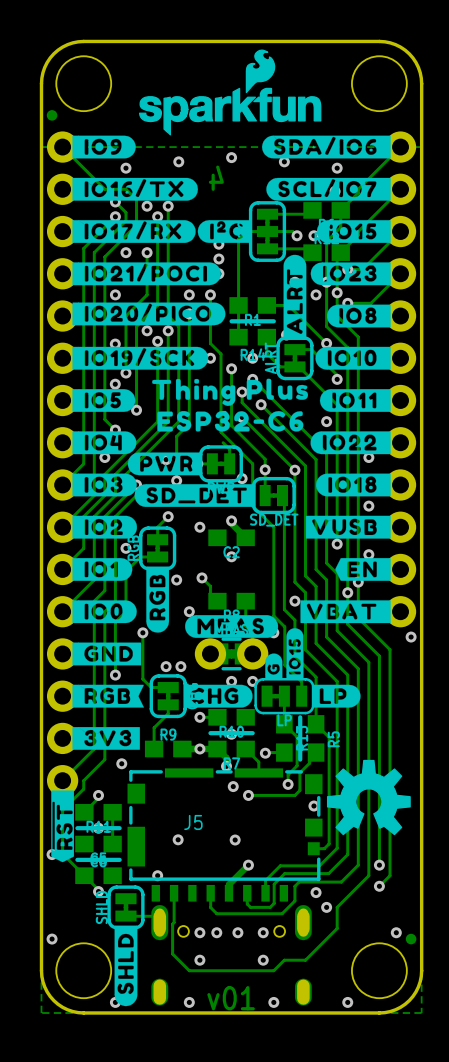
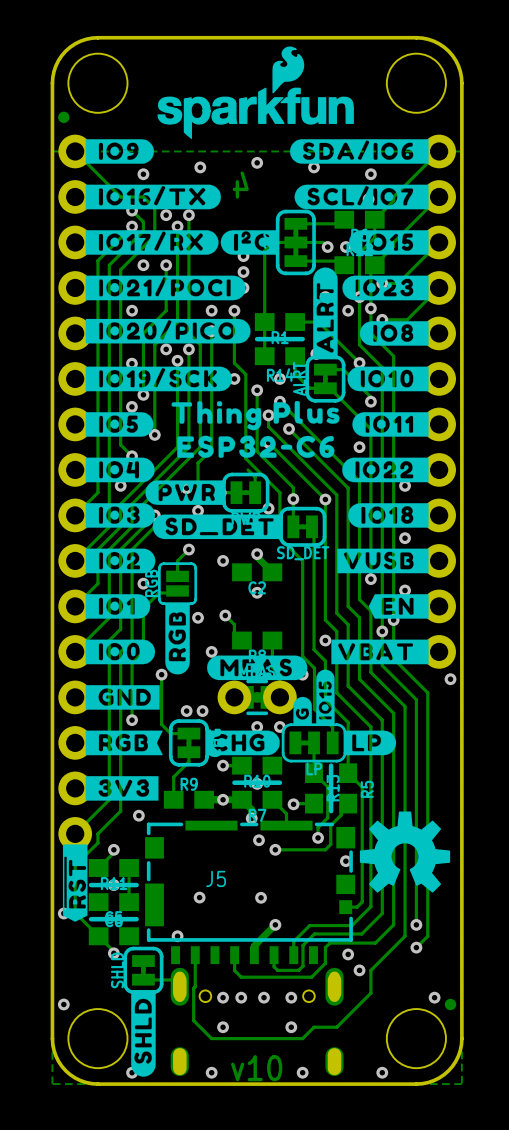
RGB footprint: [139, 526, 177, 571] -> [157, 562, 198, 606]
text: v01 (231, 998) -> v10 (256, 1068)

